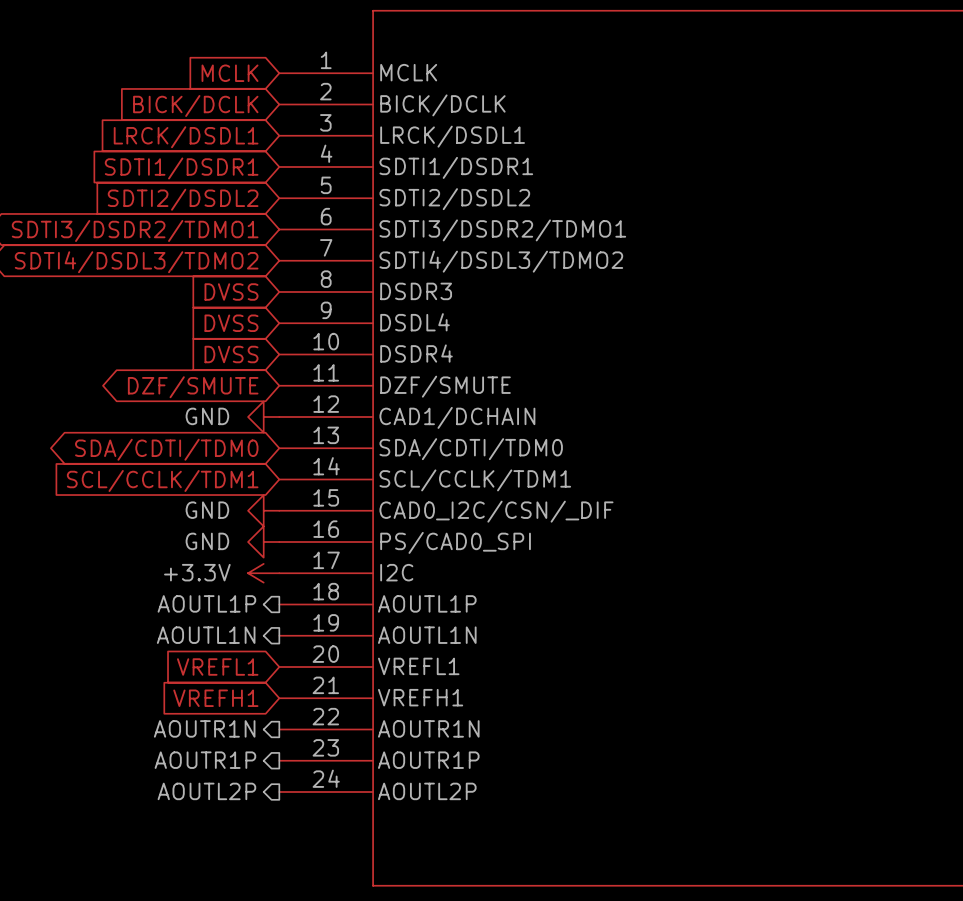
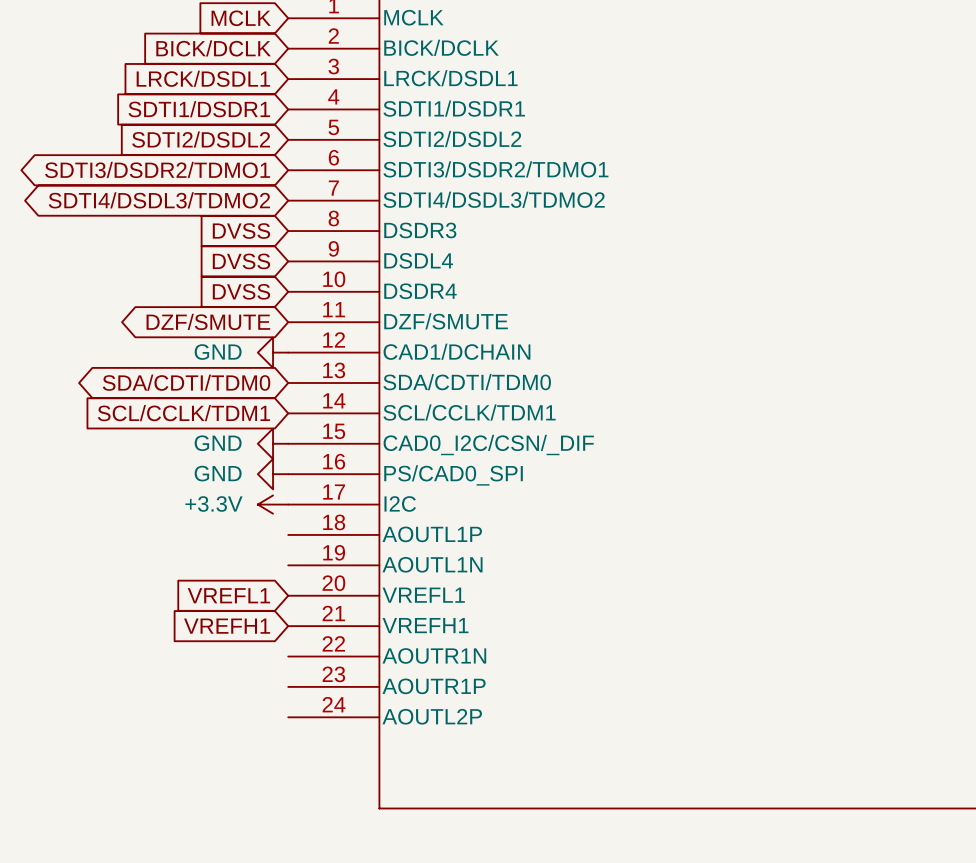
hierarchical label: AOUTL1P (206, 603) -> none
hierarchical label: AOUTL1N (206, 635) -> none
hierarchical label: AOUTR1N (204, 728) -> none
hierarchical label: AOUTR1P (205, 760) -> none
hierarchical label: AOUTL2P (206, 791) -> none

